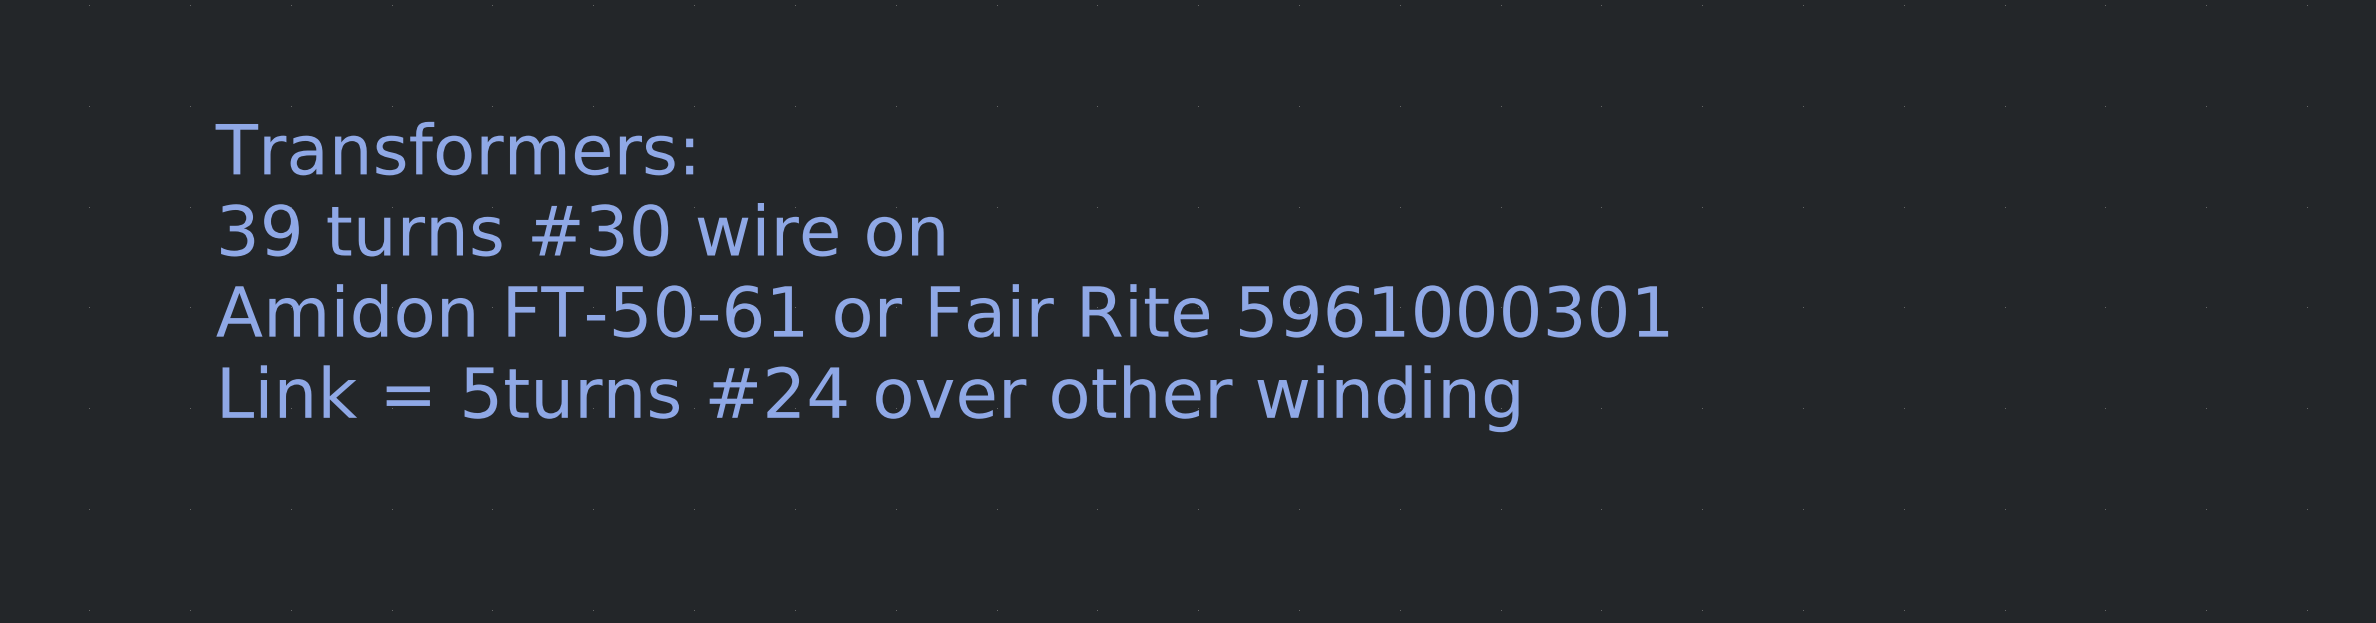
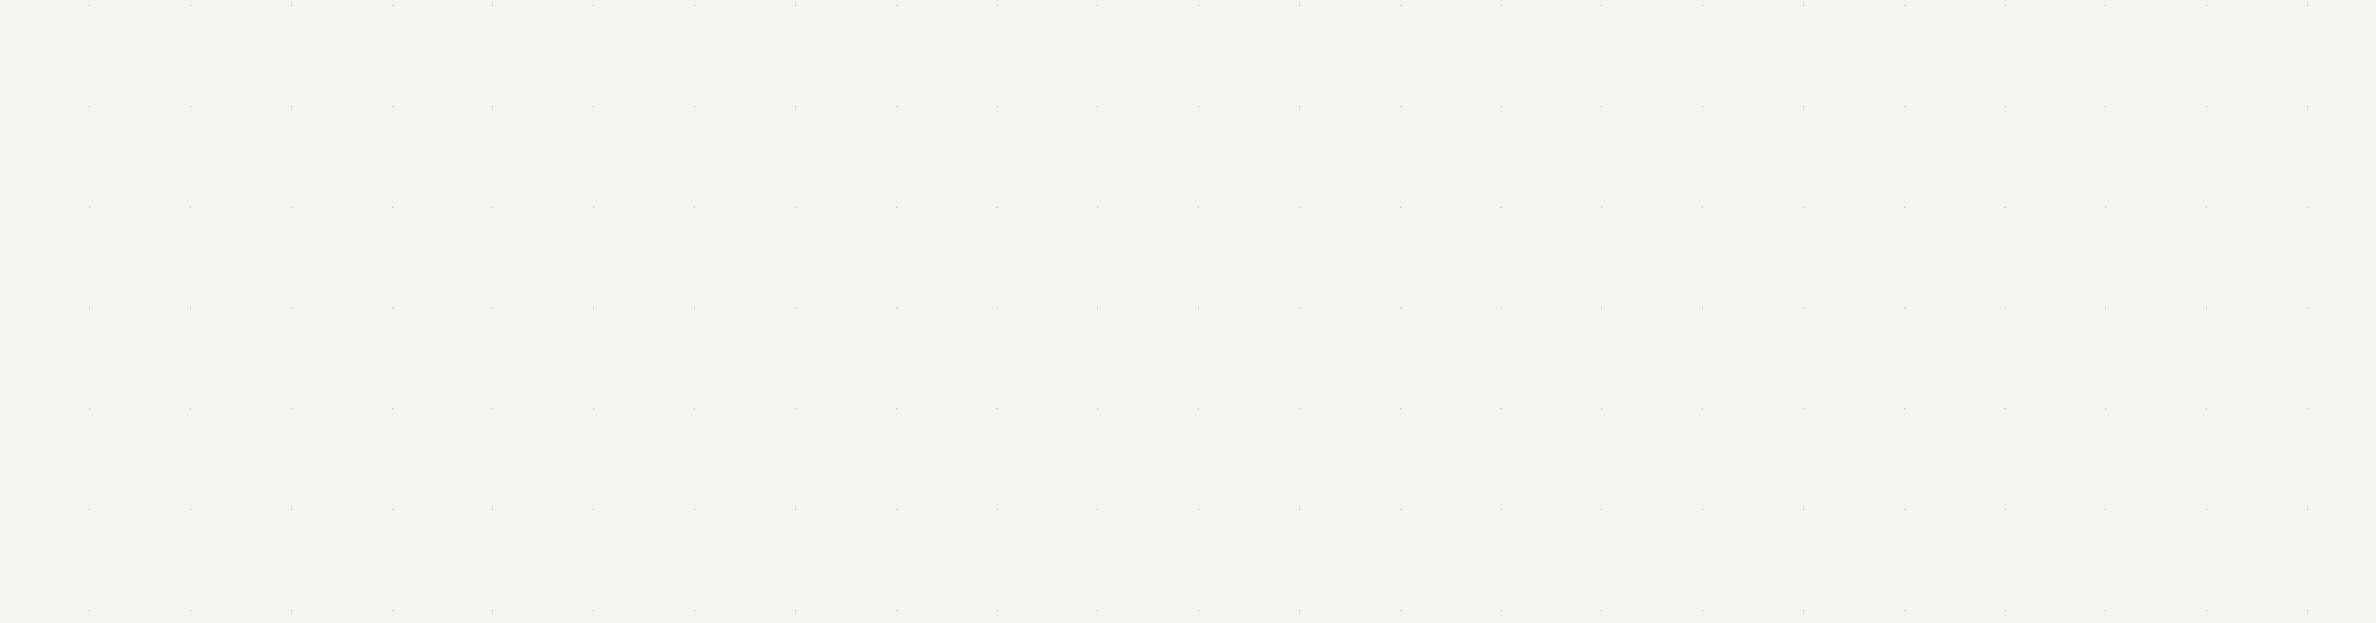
text: Transformers: (454, 148) -> none
text: 39 turns #30 wire on (582, 229) -> none
text: Amidon FT-50-61 or Fair Rite 5961000301 (942, 310) -> none
text: Link = 5turns #24 over other winding (870, 398) -> none

